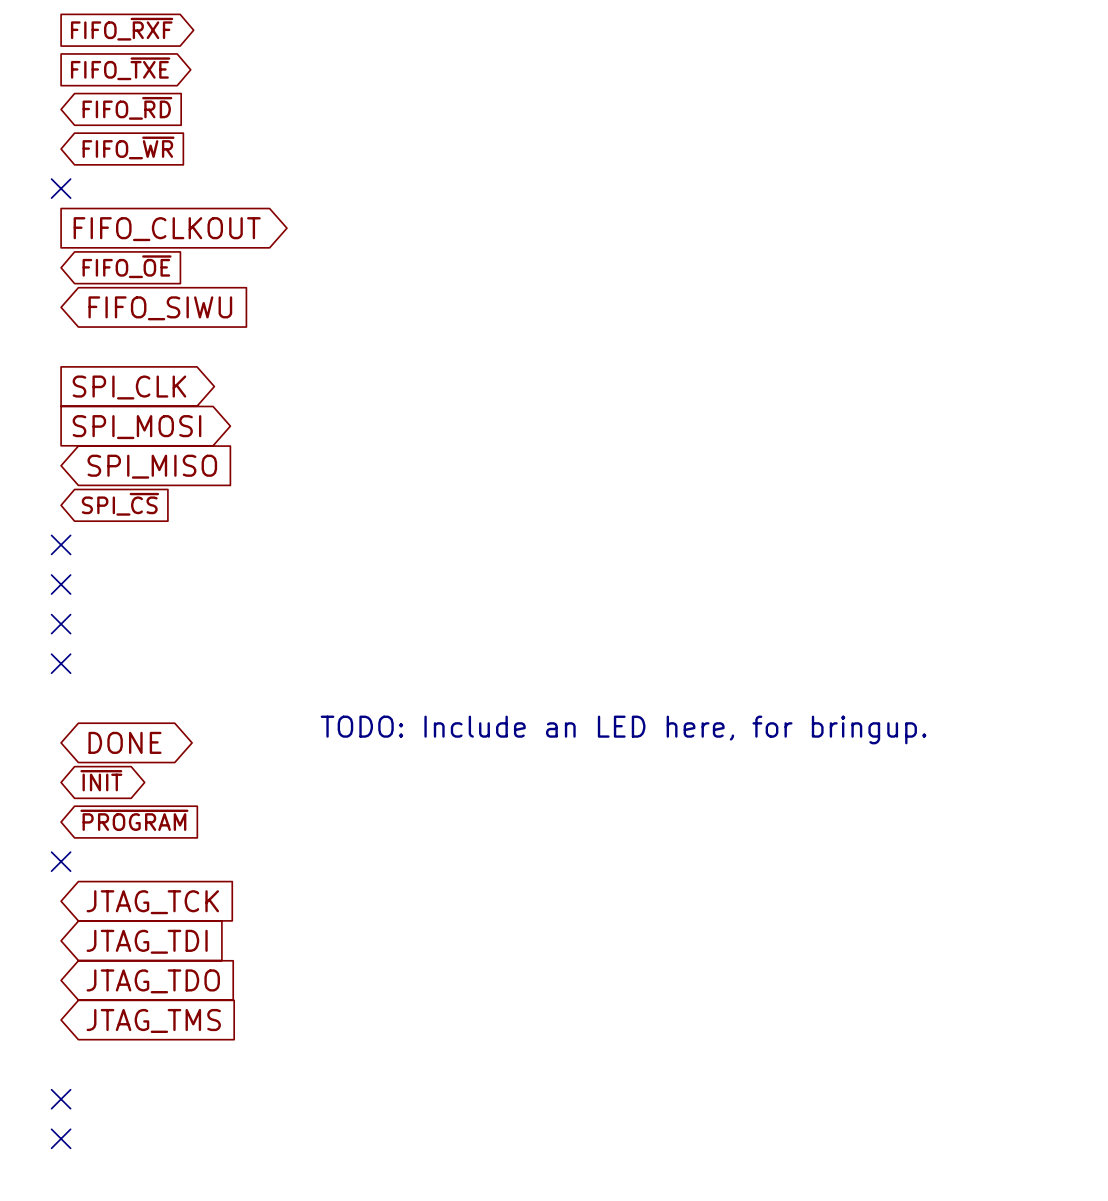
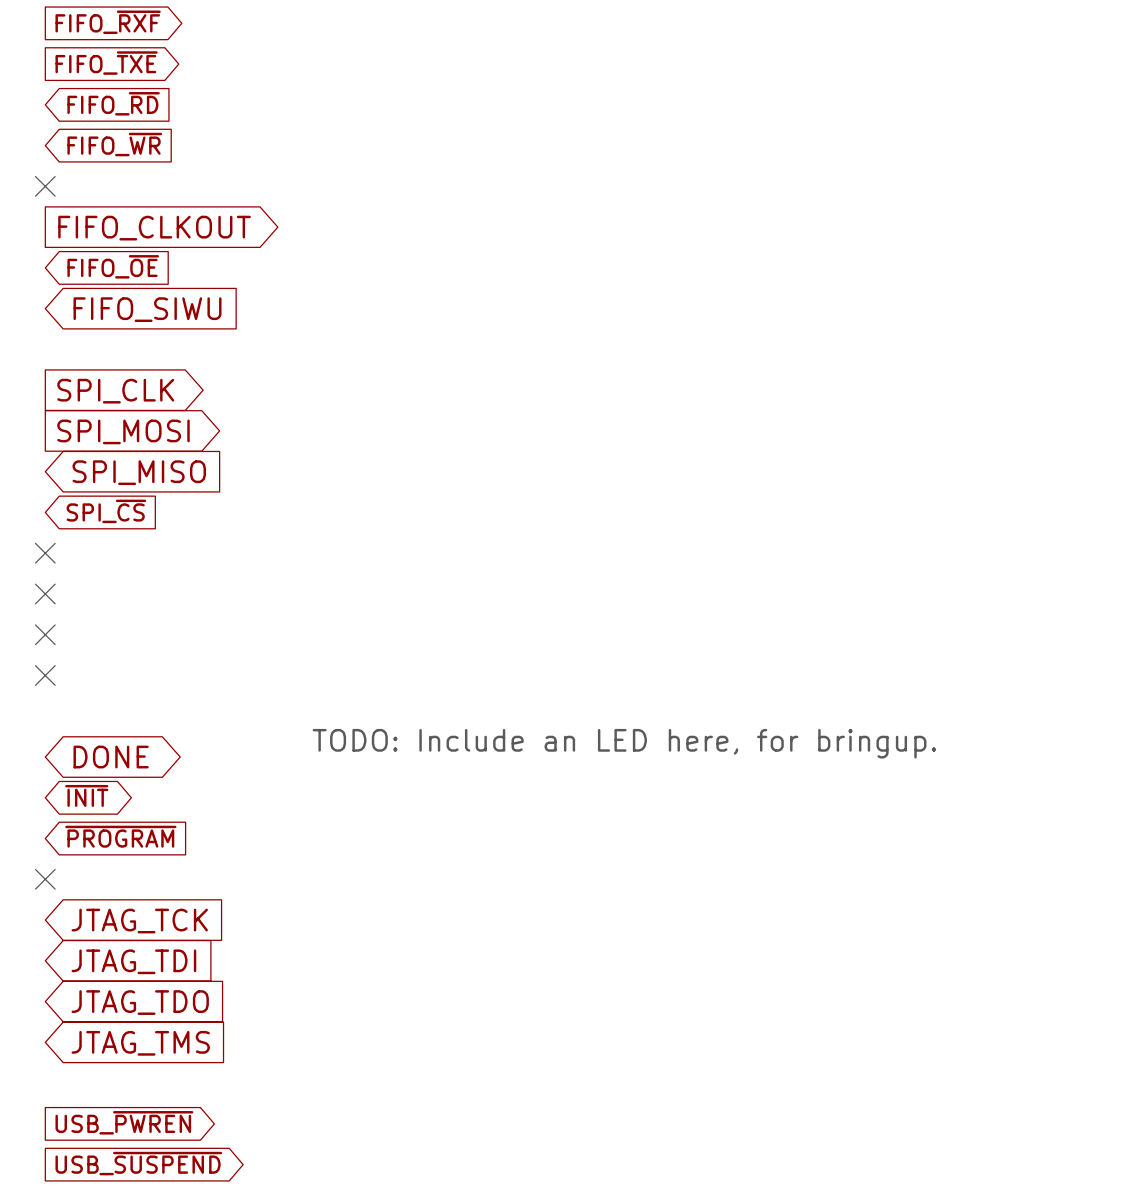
global label: none -> USB_~{PWREN} (124, 1122)
no-connect mark: (61, 1099) -> none
global label: none -> USB_~{SUSPEND} (138, 1163)
no-connect mark: (61, 1138) -> none

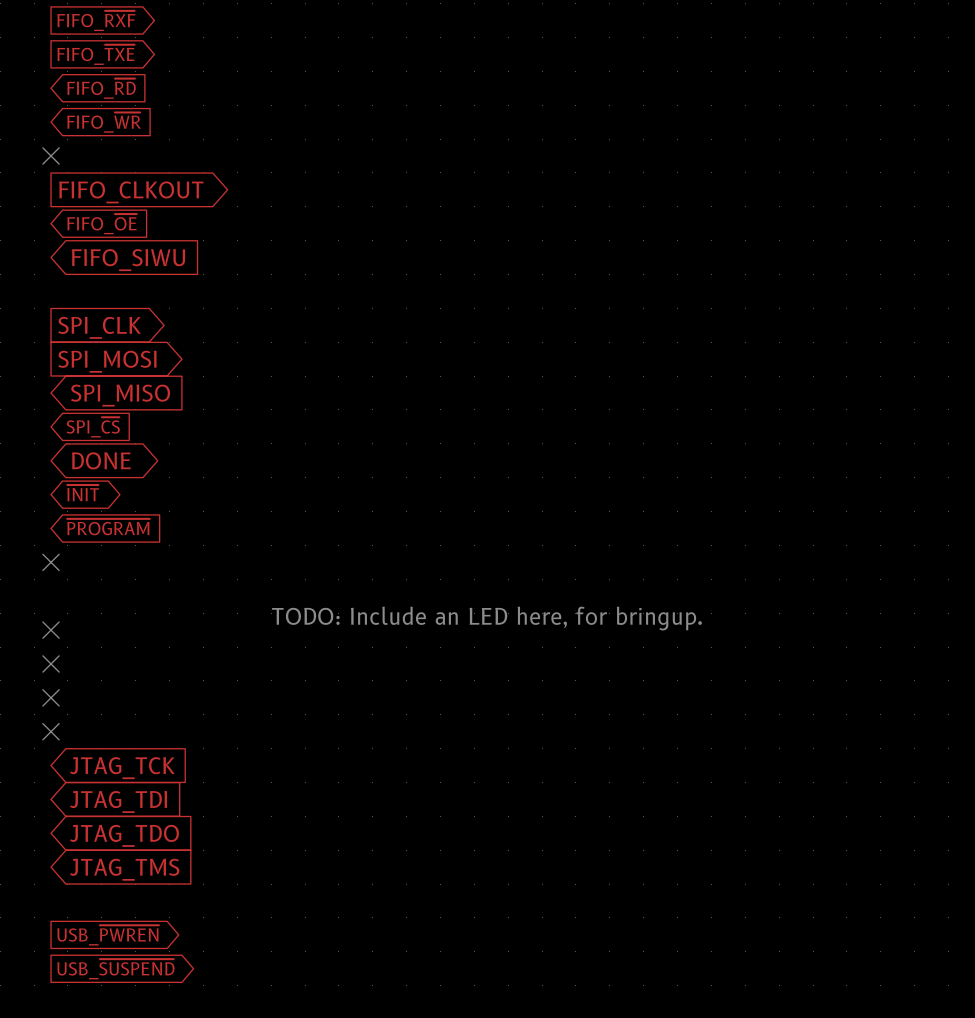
no-connect mark: (45, 553) -> none
no-connect mark: (45, 593) -> none
no-connect mark: (45, 634) -> none
no-connect mark: none -> (51, 630)
global label position: DONE (111, 757) -> DONE (101, 460)
global label position: ~{INIT} (86, 795) -> ~{INIT} (83, 493)
no-connect mark: none -> (51, 663)
global label position: ~{PROGRAM} (120, 836) -> ~{PROGRAM} (108, 527)
no-connect mark: none -> (51, 697)

